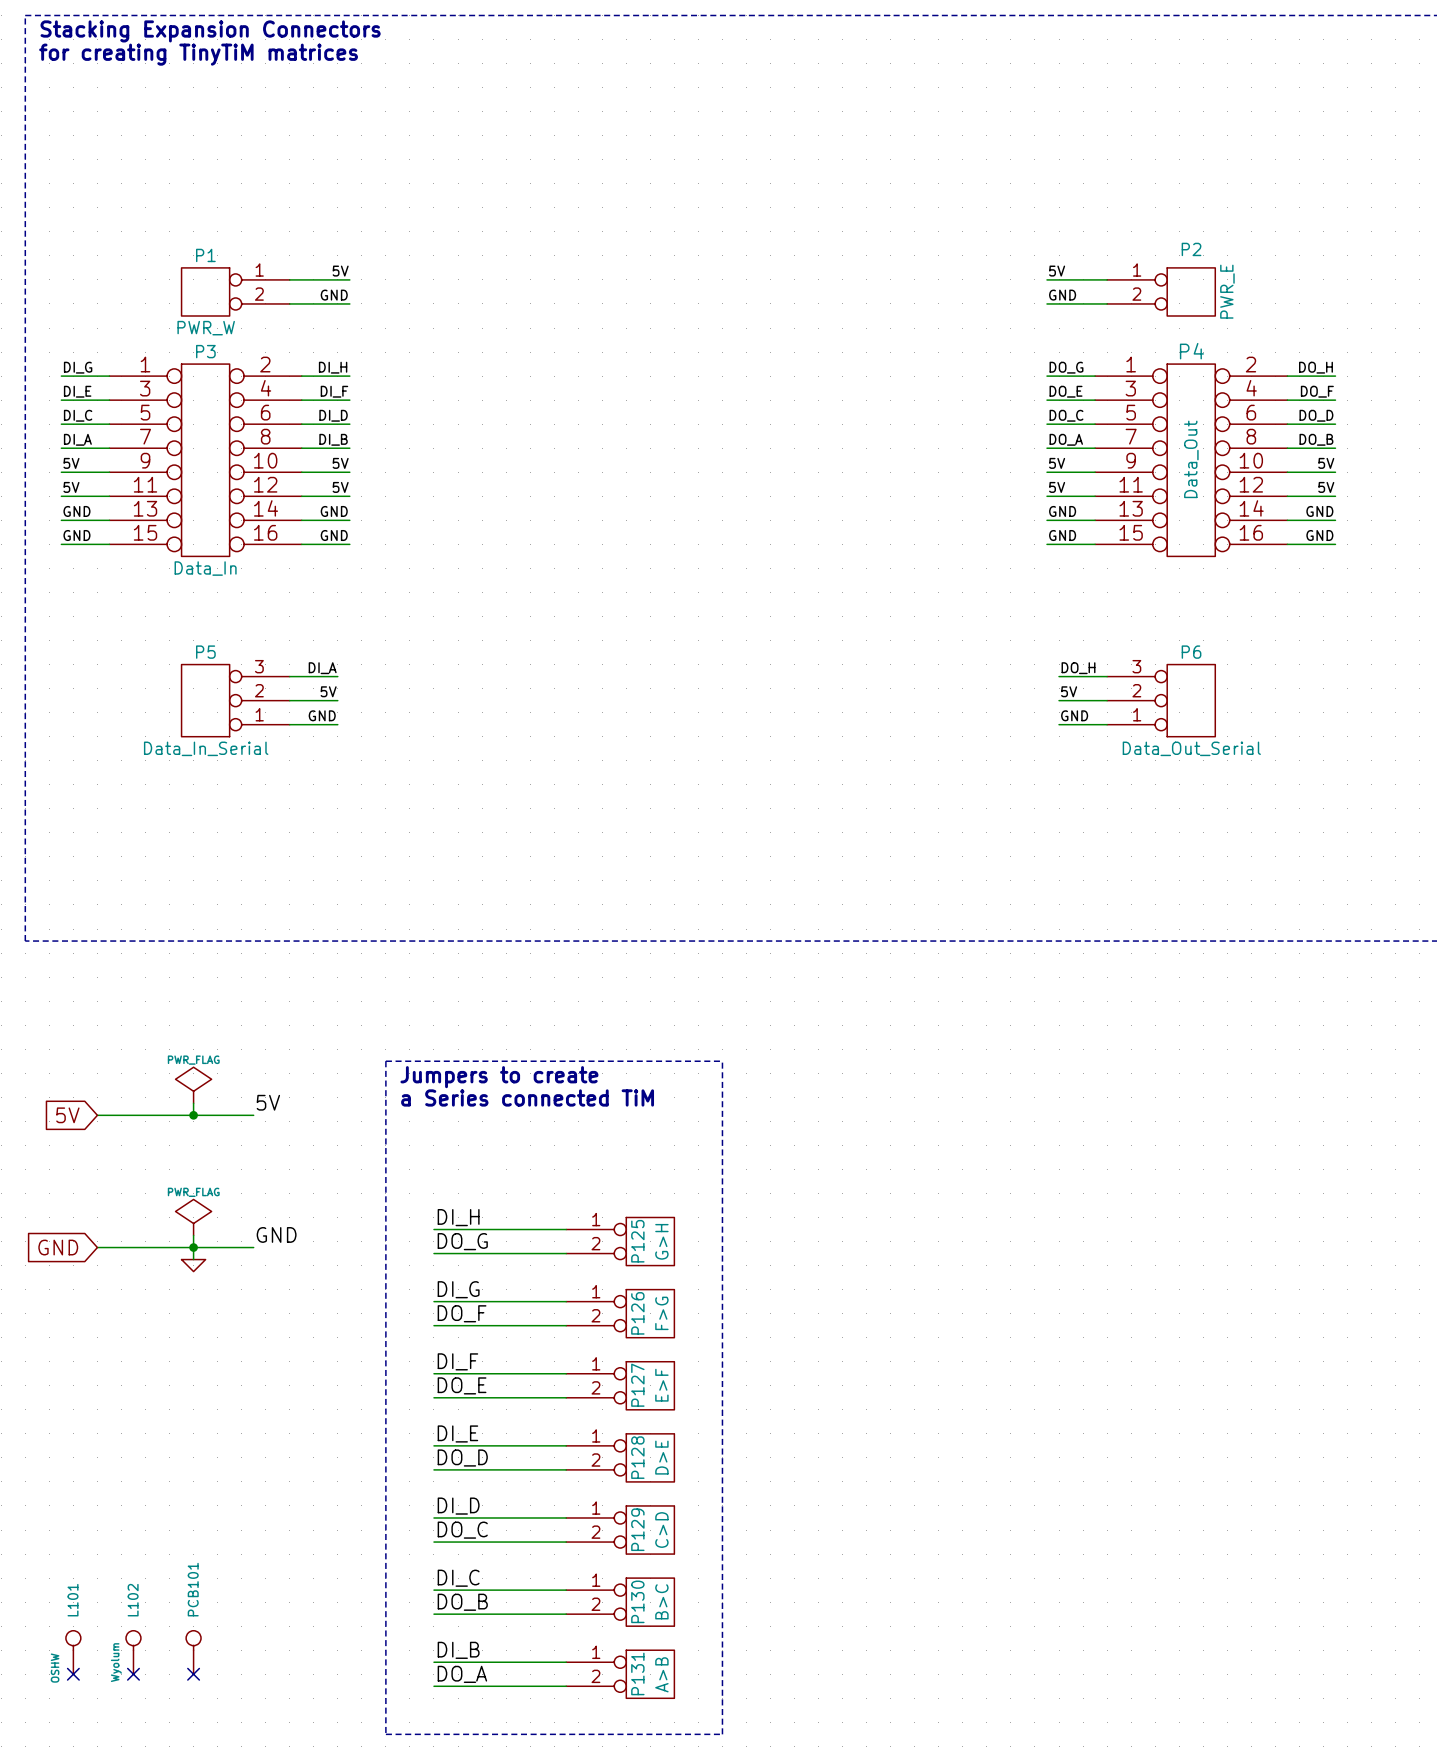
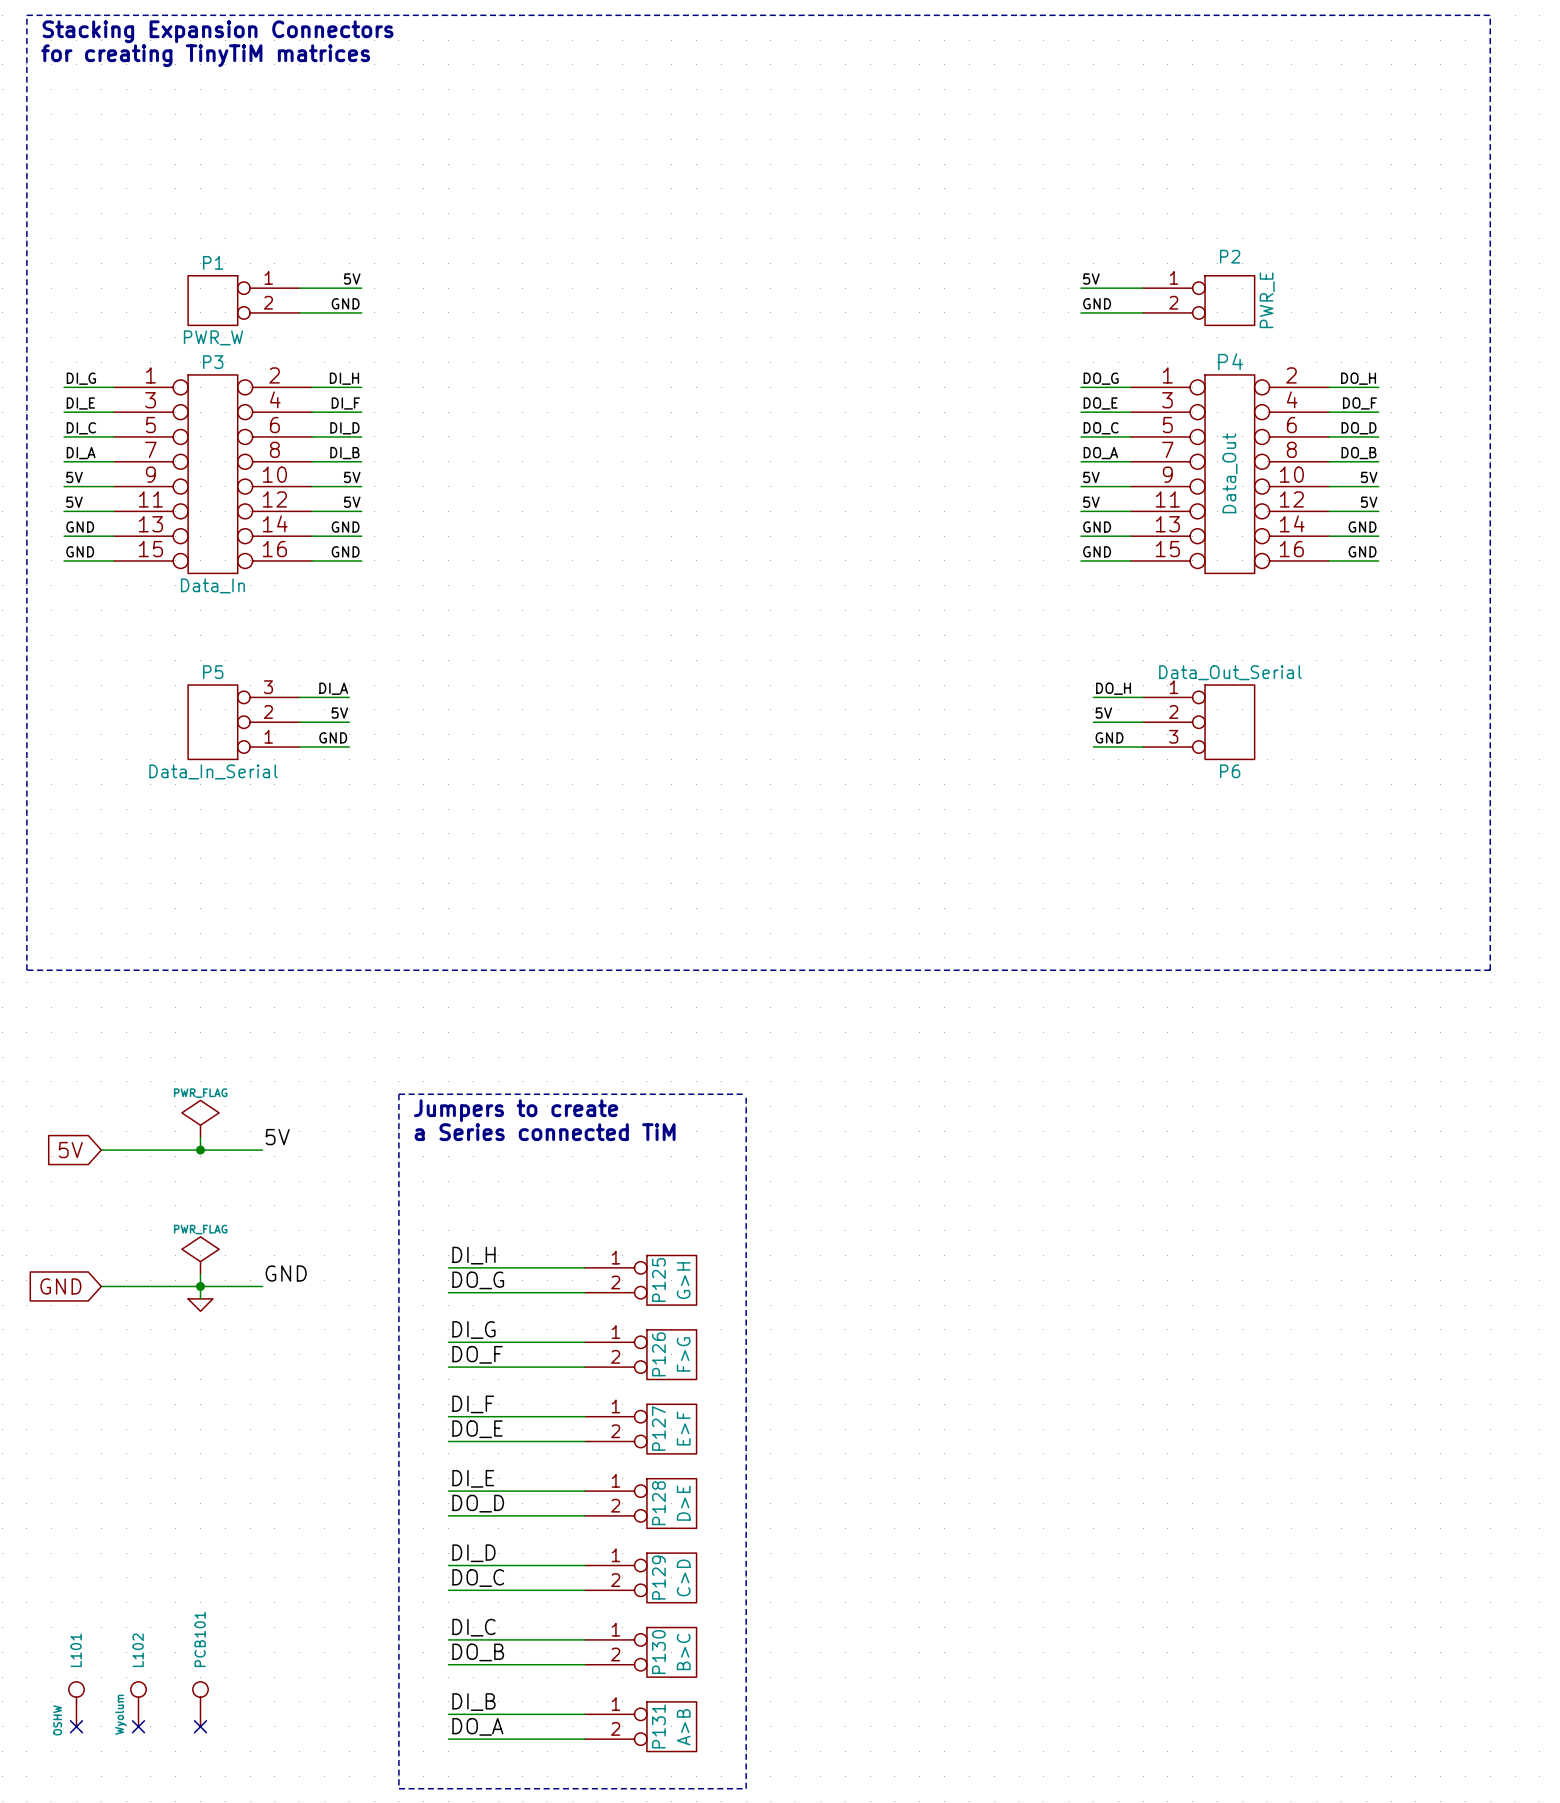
P6 flip: as is (1191, 700) -> up-down (1229, 722)

